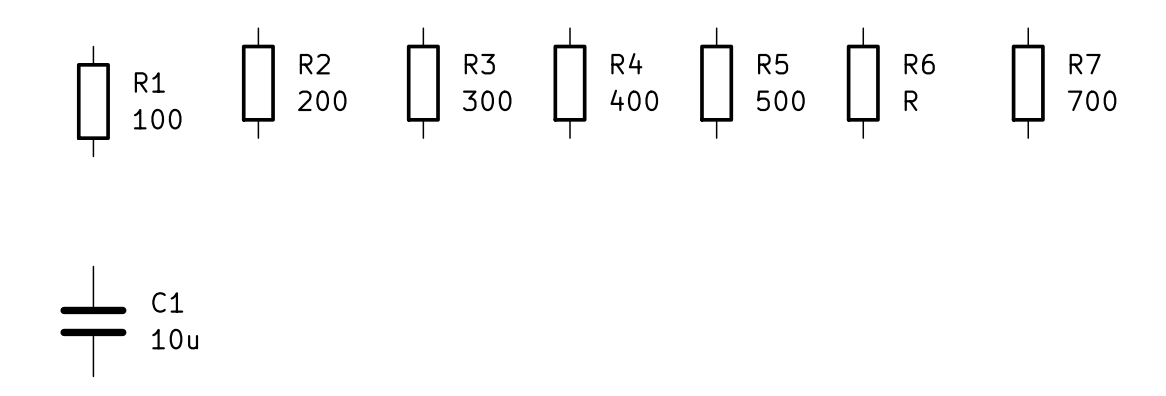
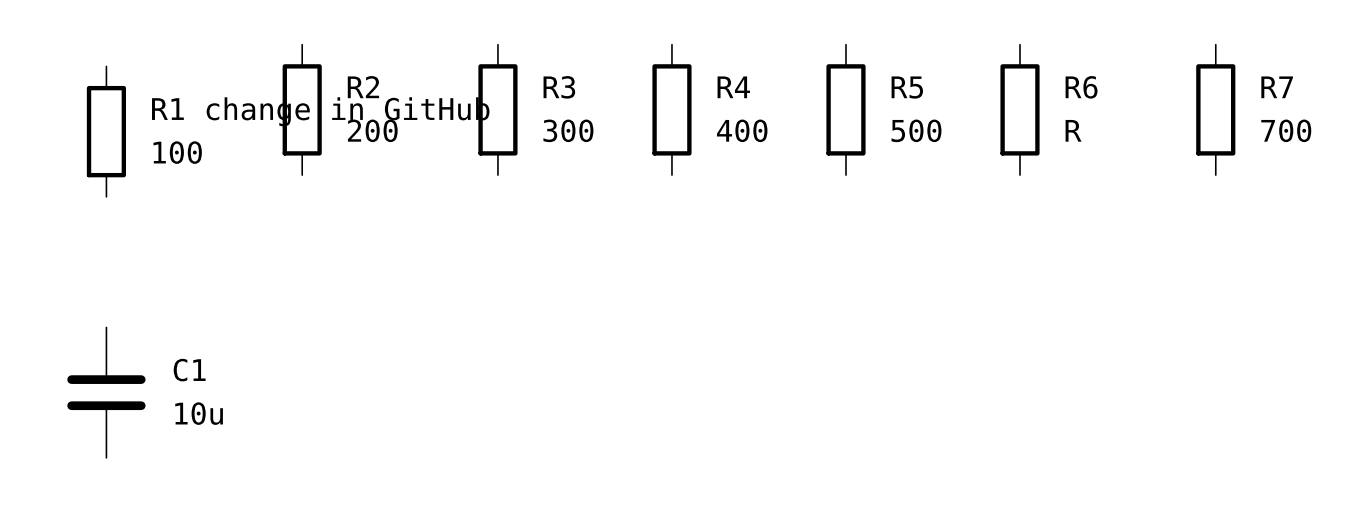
R1 name: R1 (149, 82) -> R1 change in GitHub (320, 111)

